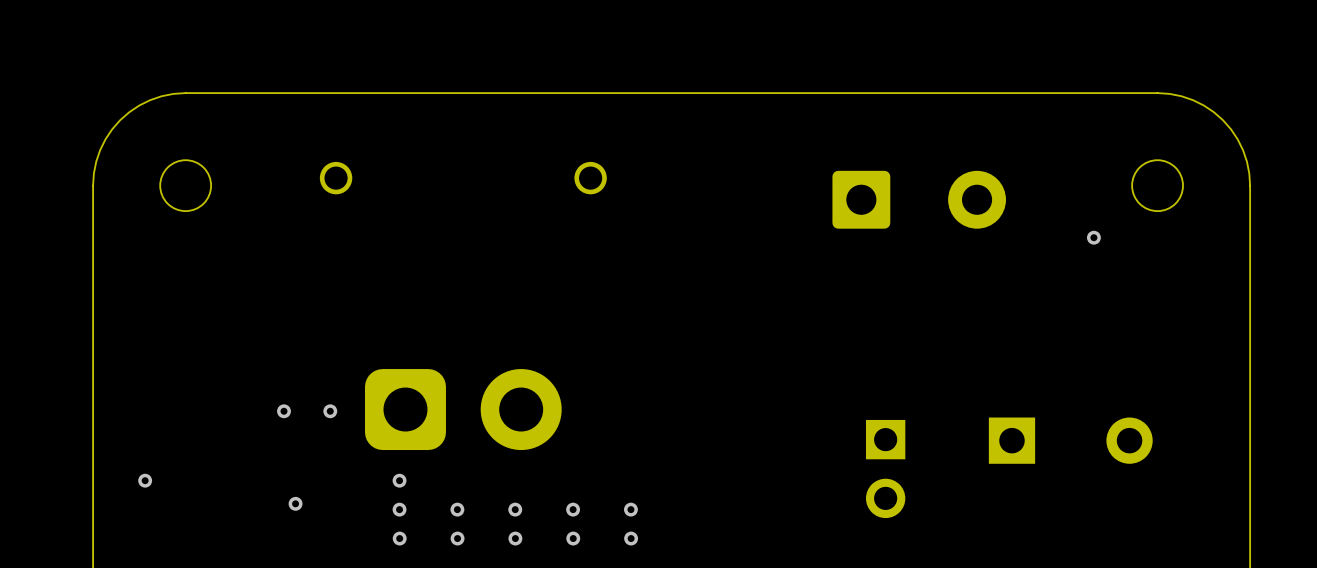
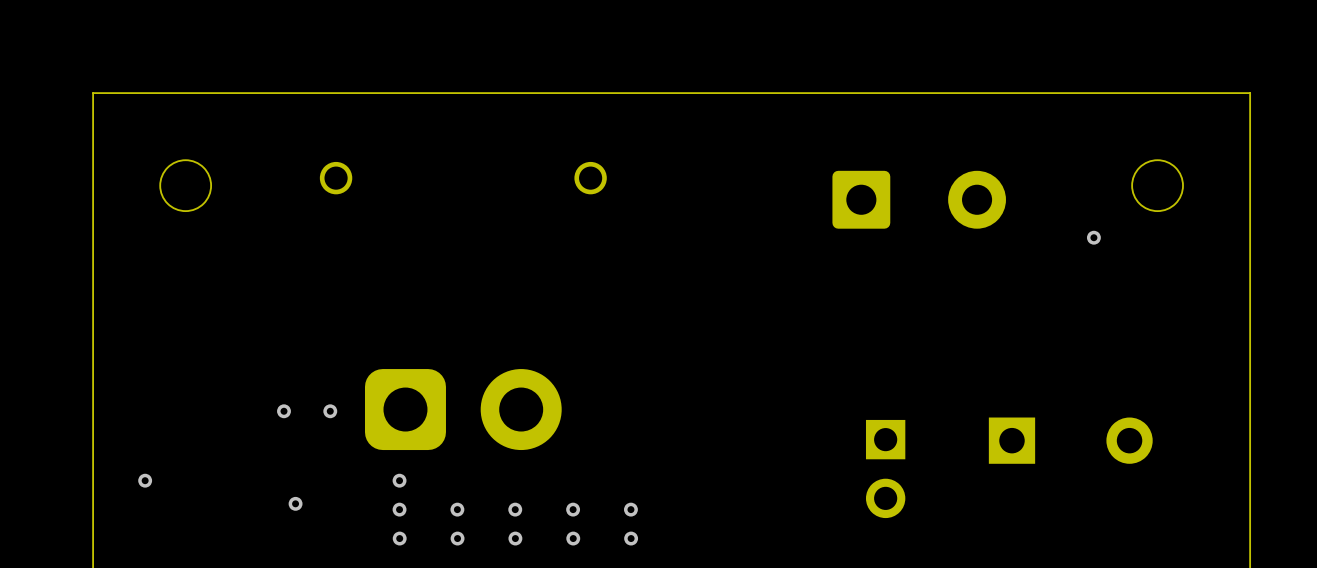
board edge: (185, 93) (173, 93) (150, 100) (139, 105) (120, 120) (112, 129) (100, 150) (96, 161) (93, 185) -> (185, 93) (93, 93) (93, 185)
board edge: (1157, 93) (1169, 93) (1192, 100) (1203, 105) (1223, 120) (1237, 139) (1243, 150) (1249, 173) (1250, 185) -> (1157, 93) (1250, 93) (1250, 185)

